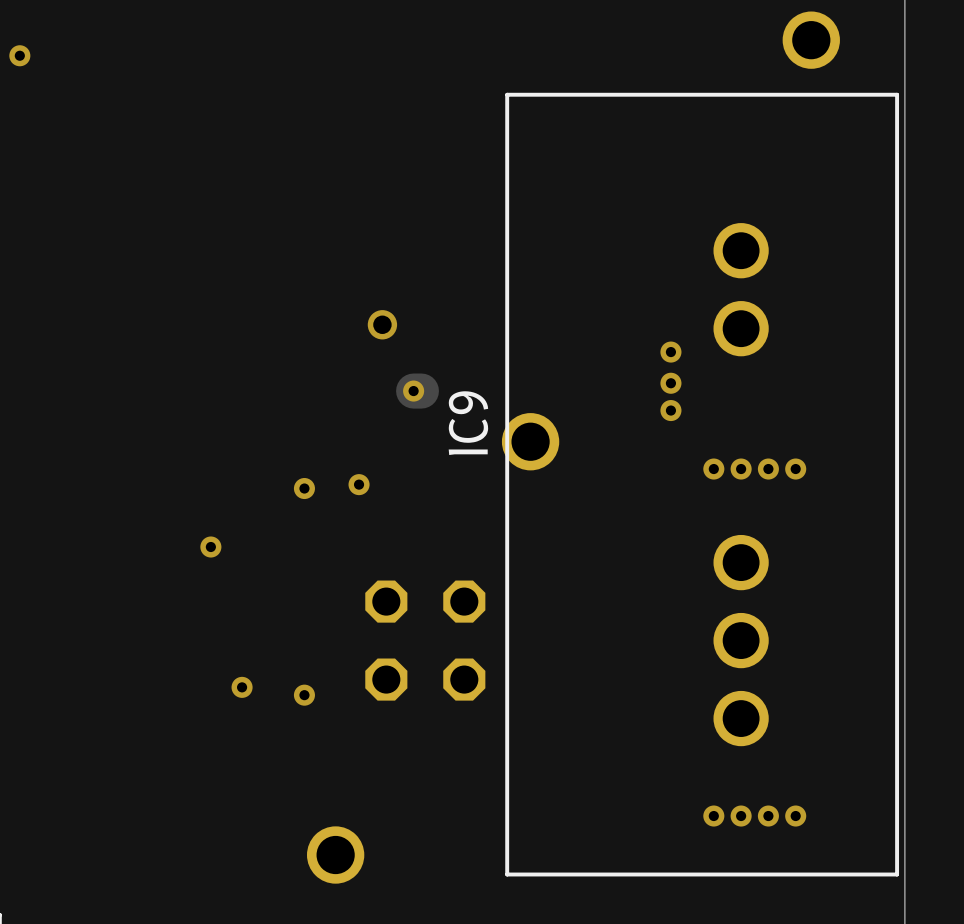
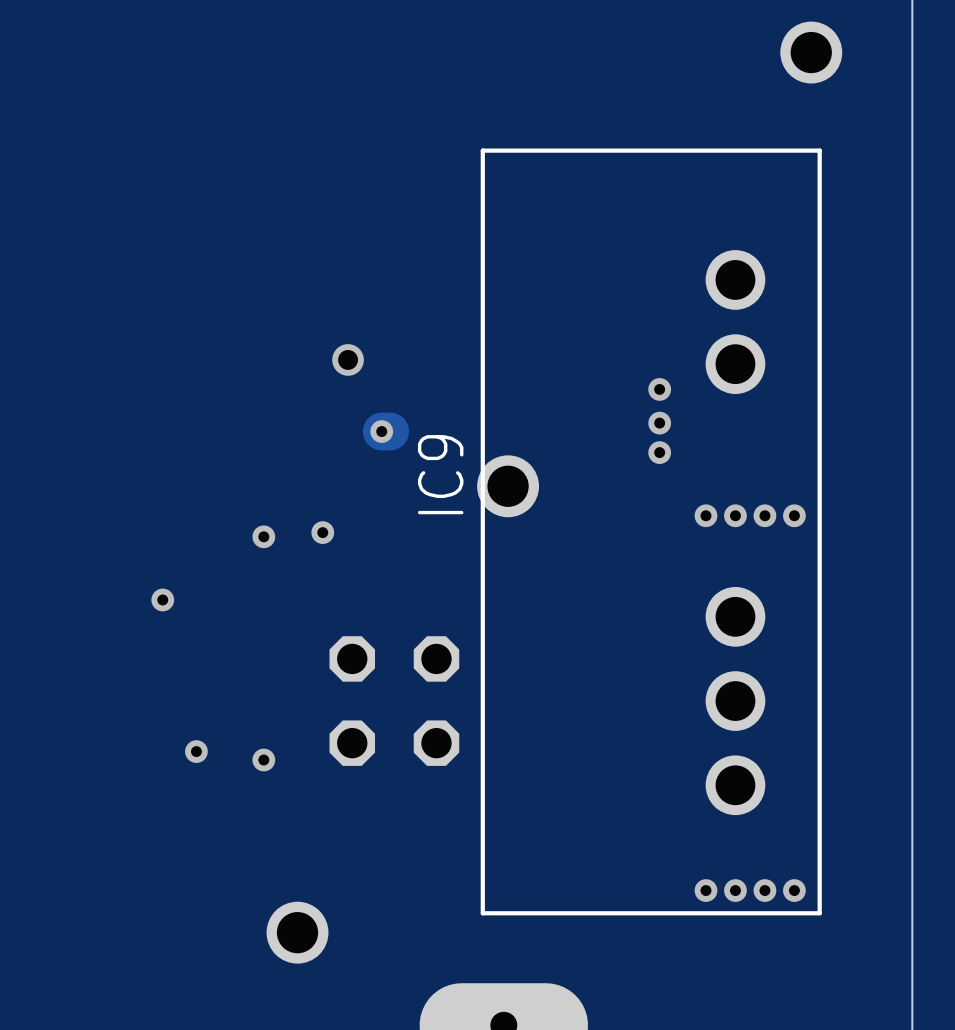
IC9 footprint: [505, 92, 900, 877] -> [480, 148, 822, 916]

